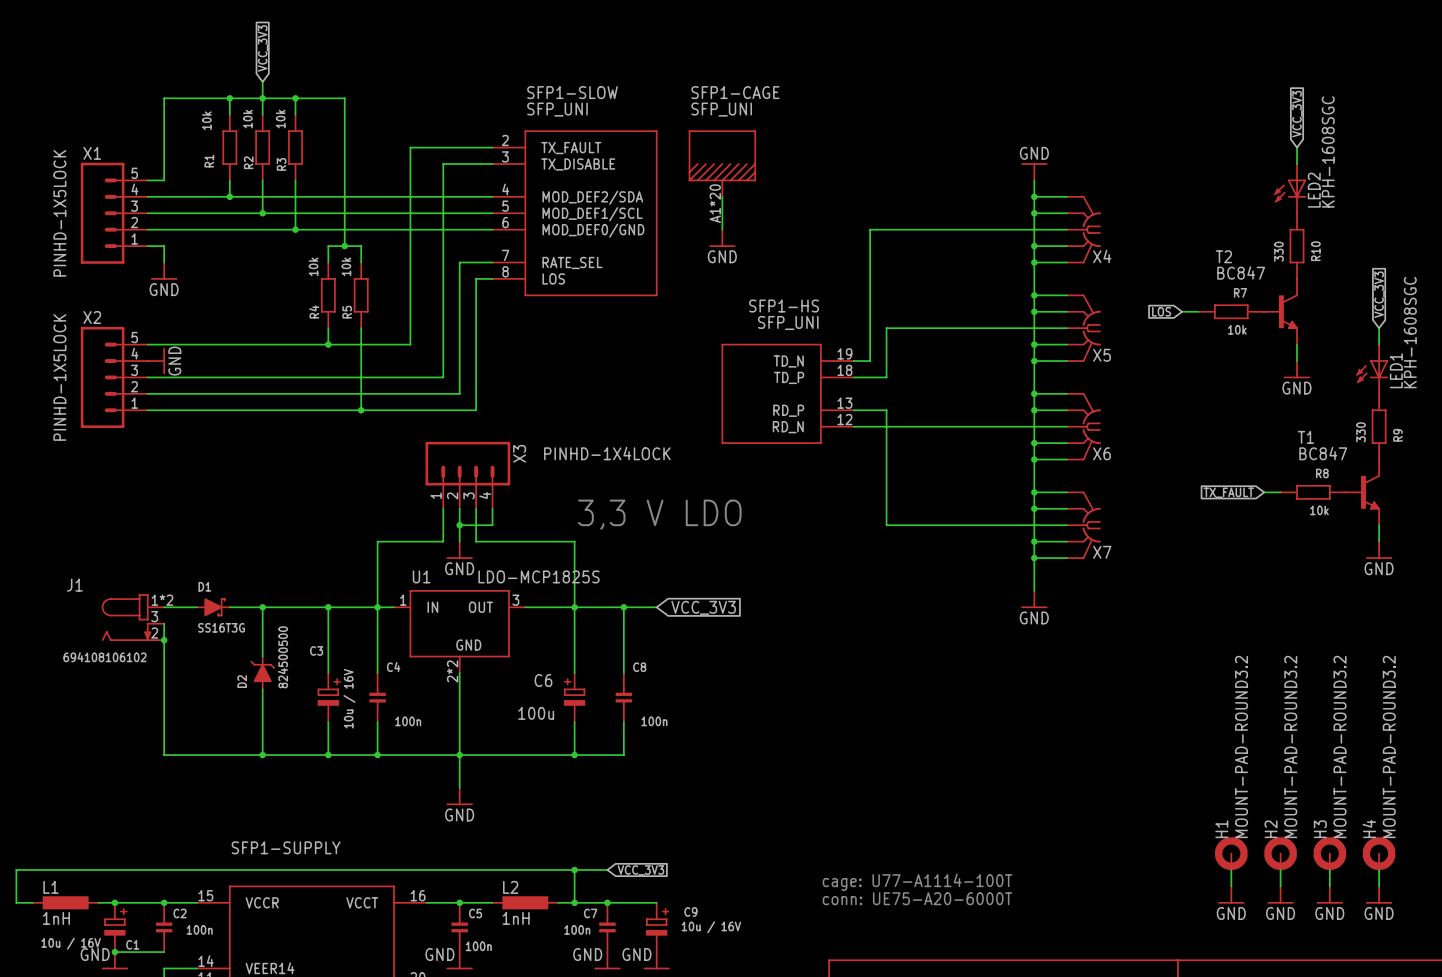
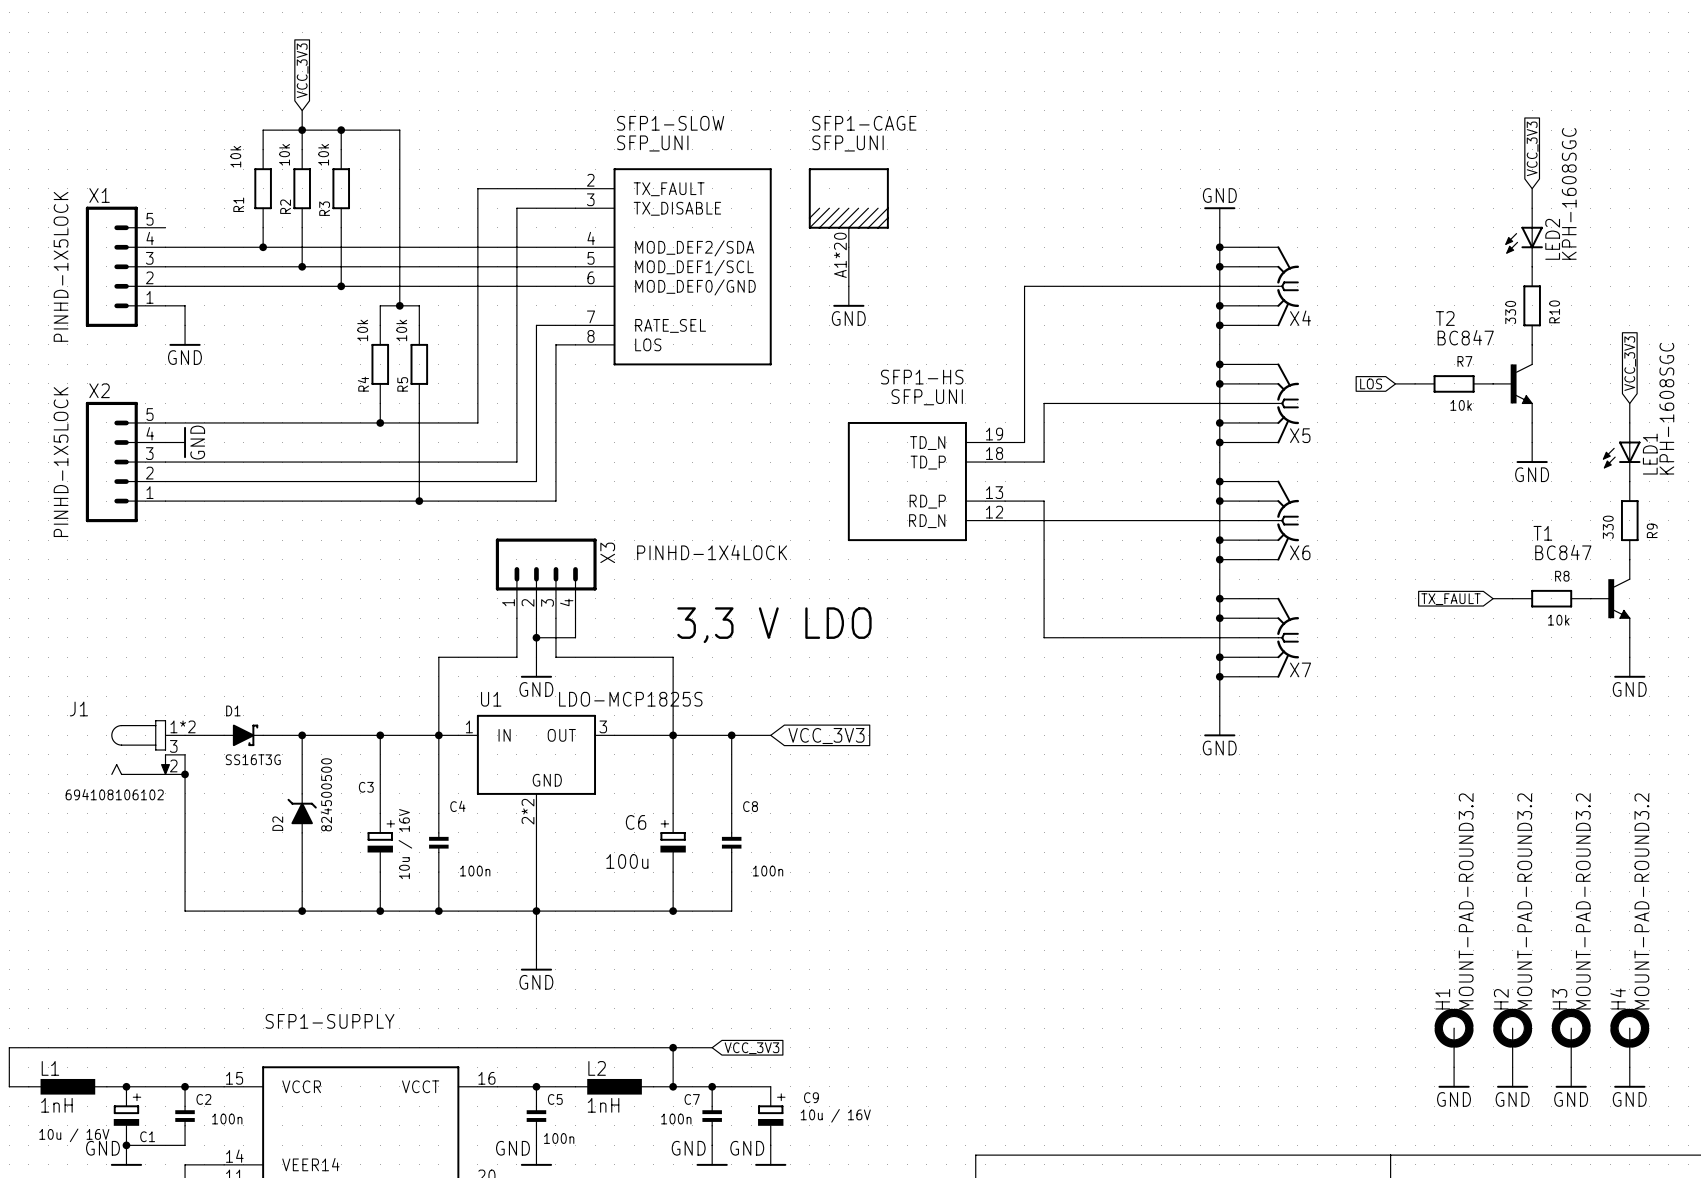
wire: (229, 98) (164, 98) (164, 180) (147, 180) -> none
junction: (229, 98) -> none
text: cage: U77-A1114-100T (917, 882) -> none
text: conn: UE75-A20-6000T (917, 898) -> none

